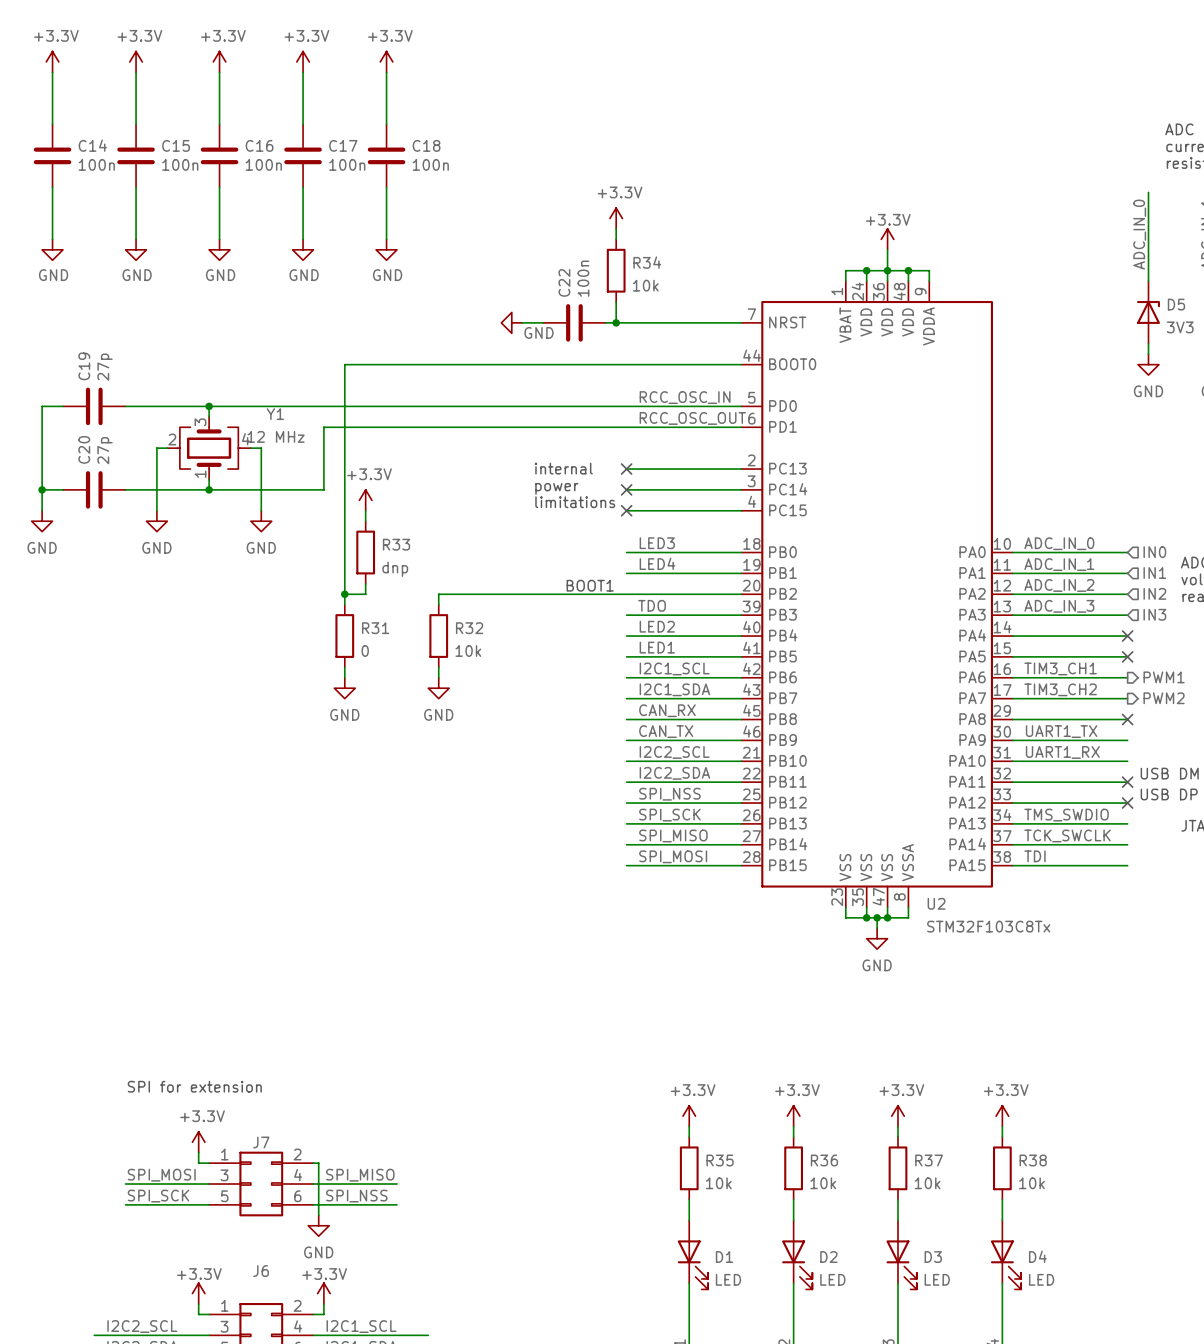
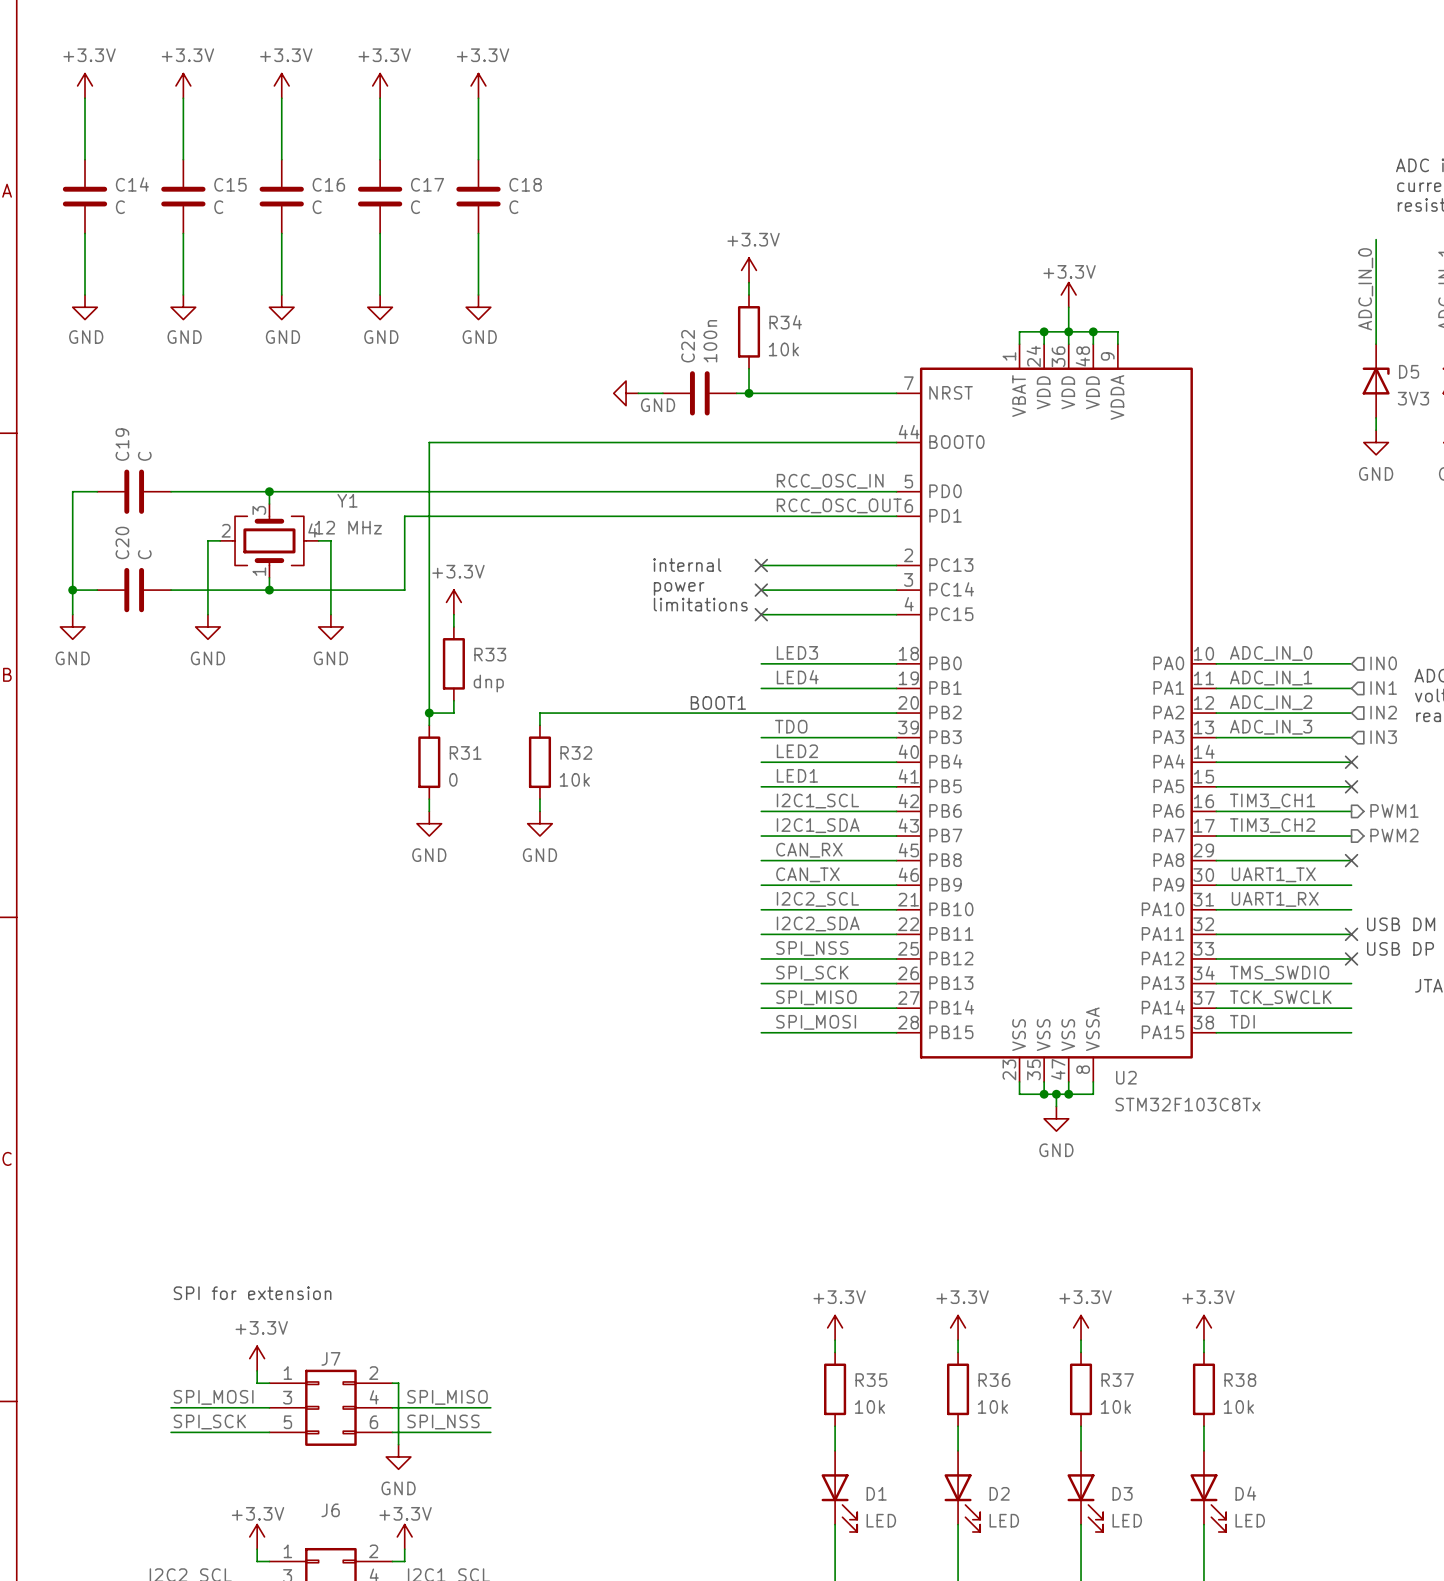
C14 value: 100n (96, 164) -> C (120, 207)
C15 value: 100n (180, 164) -> C (218, 207)
C16 value: 100n (263, 164) -> C (317, 207)
C17 value: 100n (347, 164) -> C (415, 207)
C18 value: 100n (430, 164) -> C (513, 207)
C19 value: 27p (105, 367) -> C (144, 456)
C20 value: 27p (105, 450) -> C (144, 554)

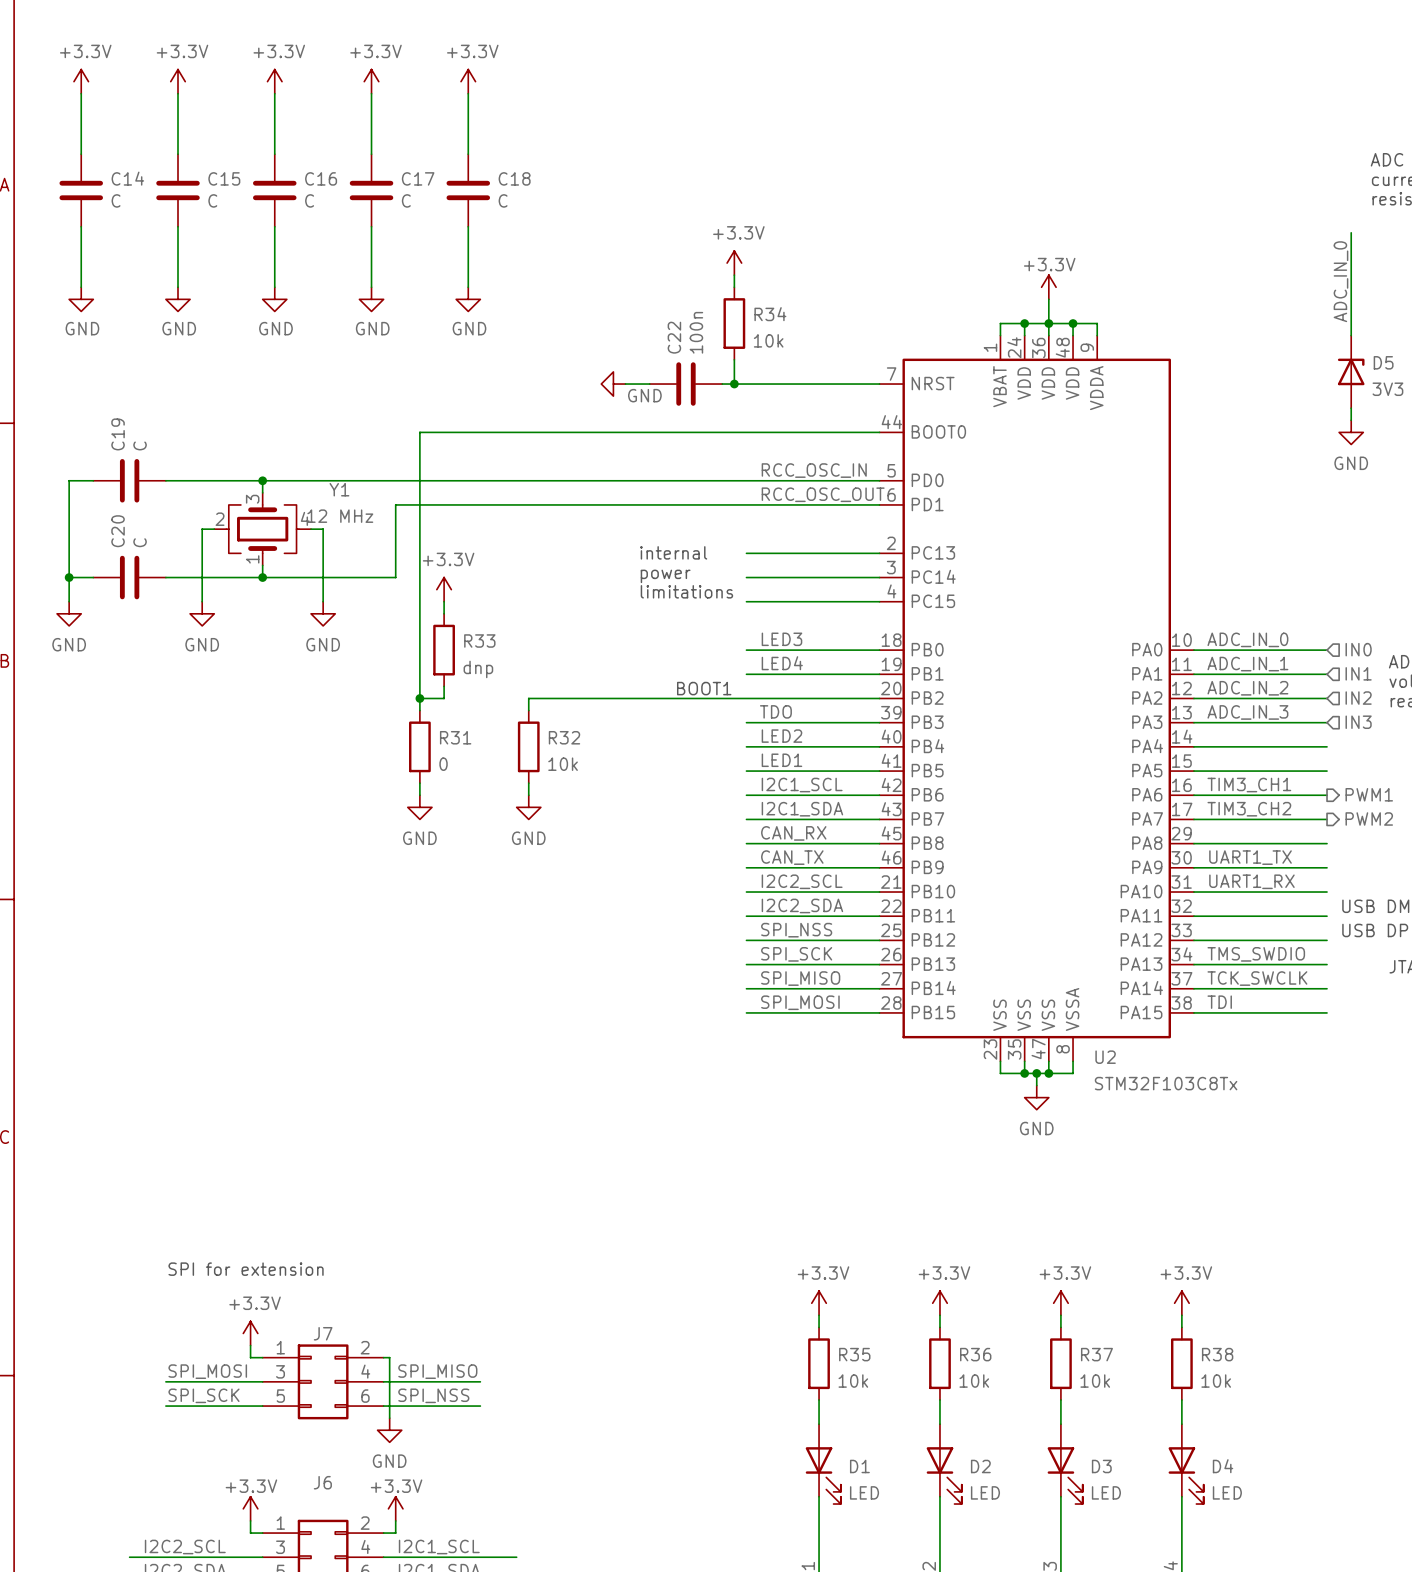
no-connect mark: (761, 565) -> none
no-connect mark: (761, 590) -> none
no-connect mark: (761, 614) -> none
no-connect mark: (1351, 762) -> none
no-connect mark: (1351, 786) -> none
no-connect mark: (1351, 860) -> none
no-connect mark: (1351, 934) -> none
no-connect mark: (1351, 958) -> none

